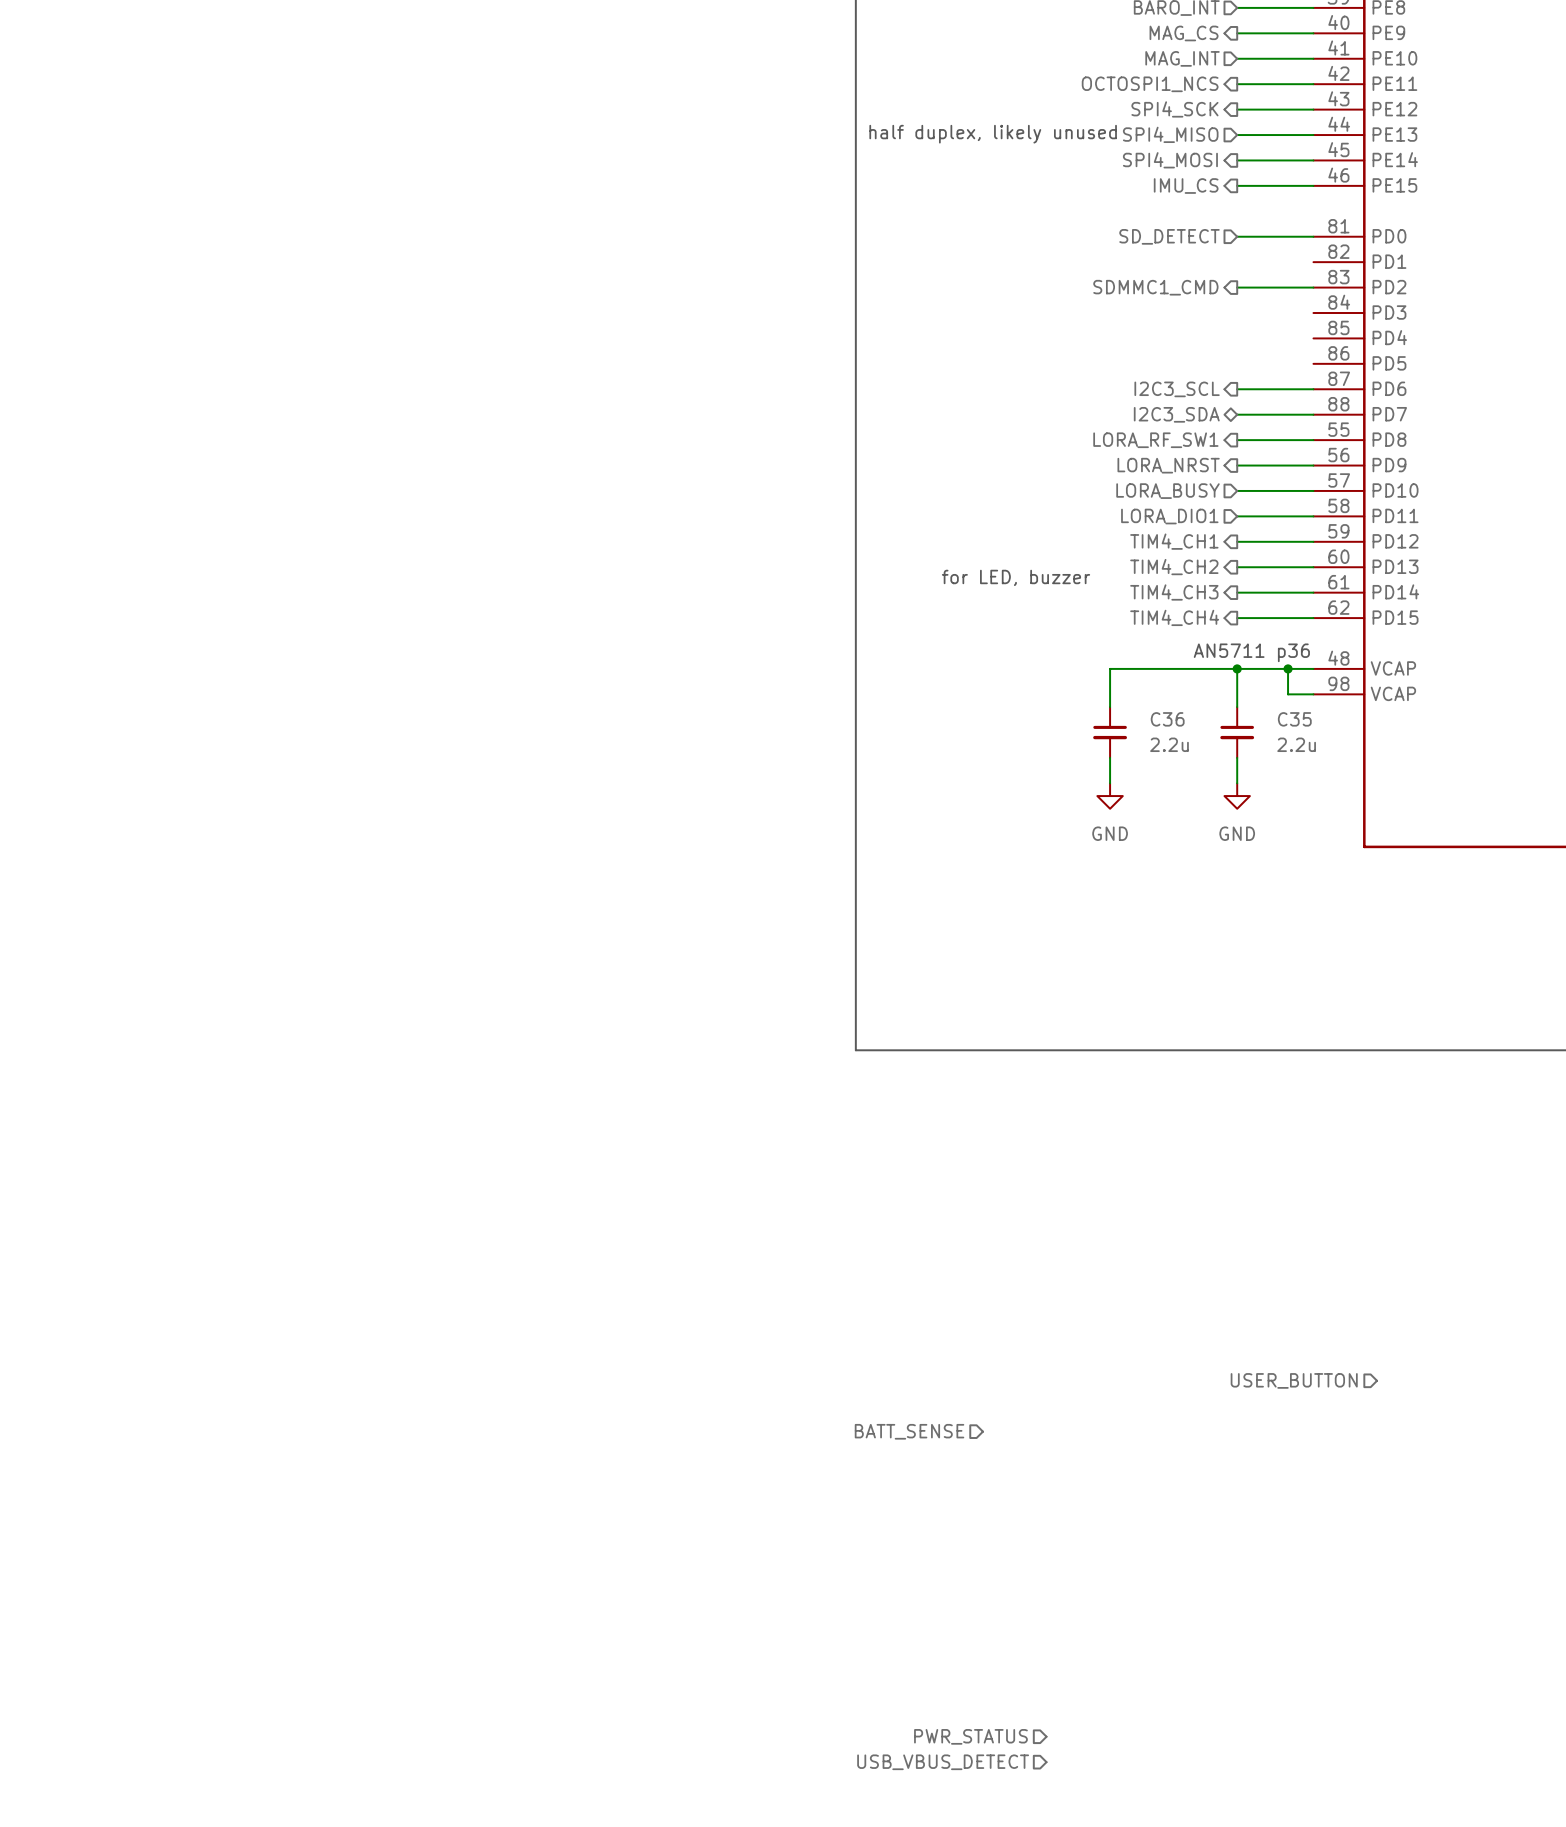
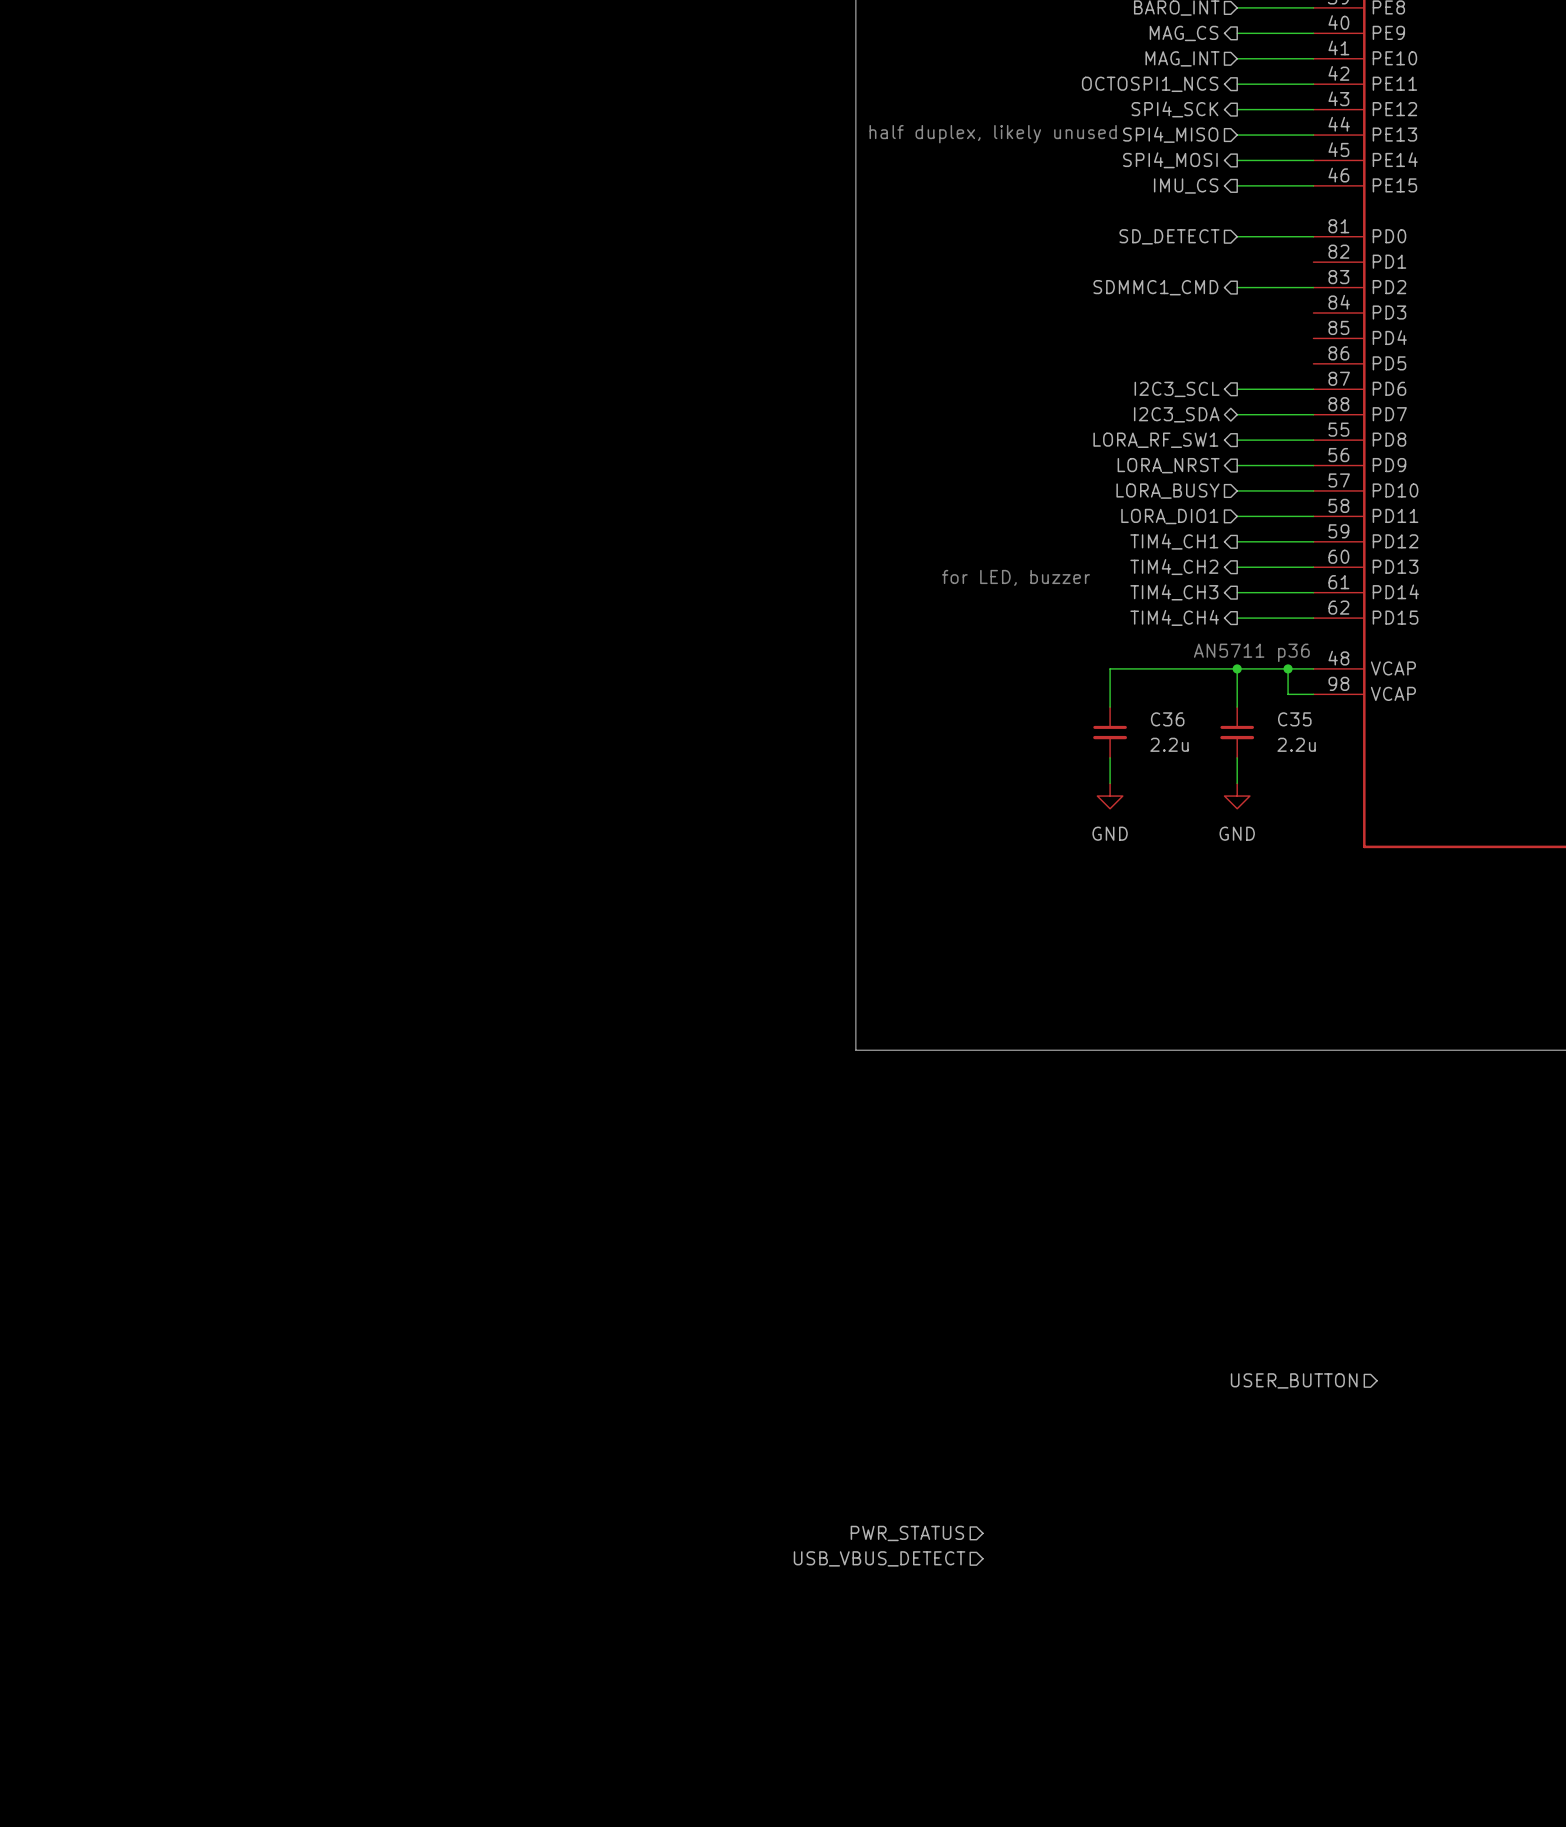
hierarchical label: BATT_SENSE (909, 1431) -> none
hierarchical label position: PWR_STATUS (970, 1736) -> PWR_STATUS (907, 1533)
hierarchical label position: USB_VBUS_DETECT (943, 1762) -> USB_VBUS_DETECT (879, 1558)

